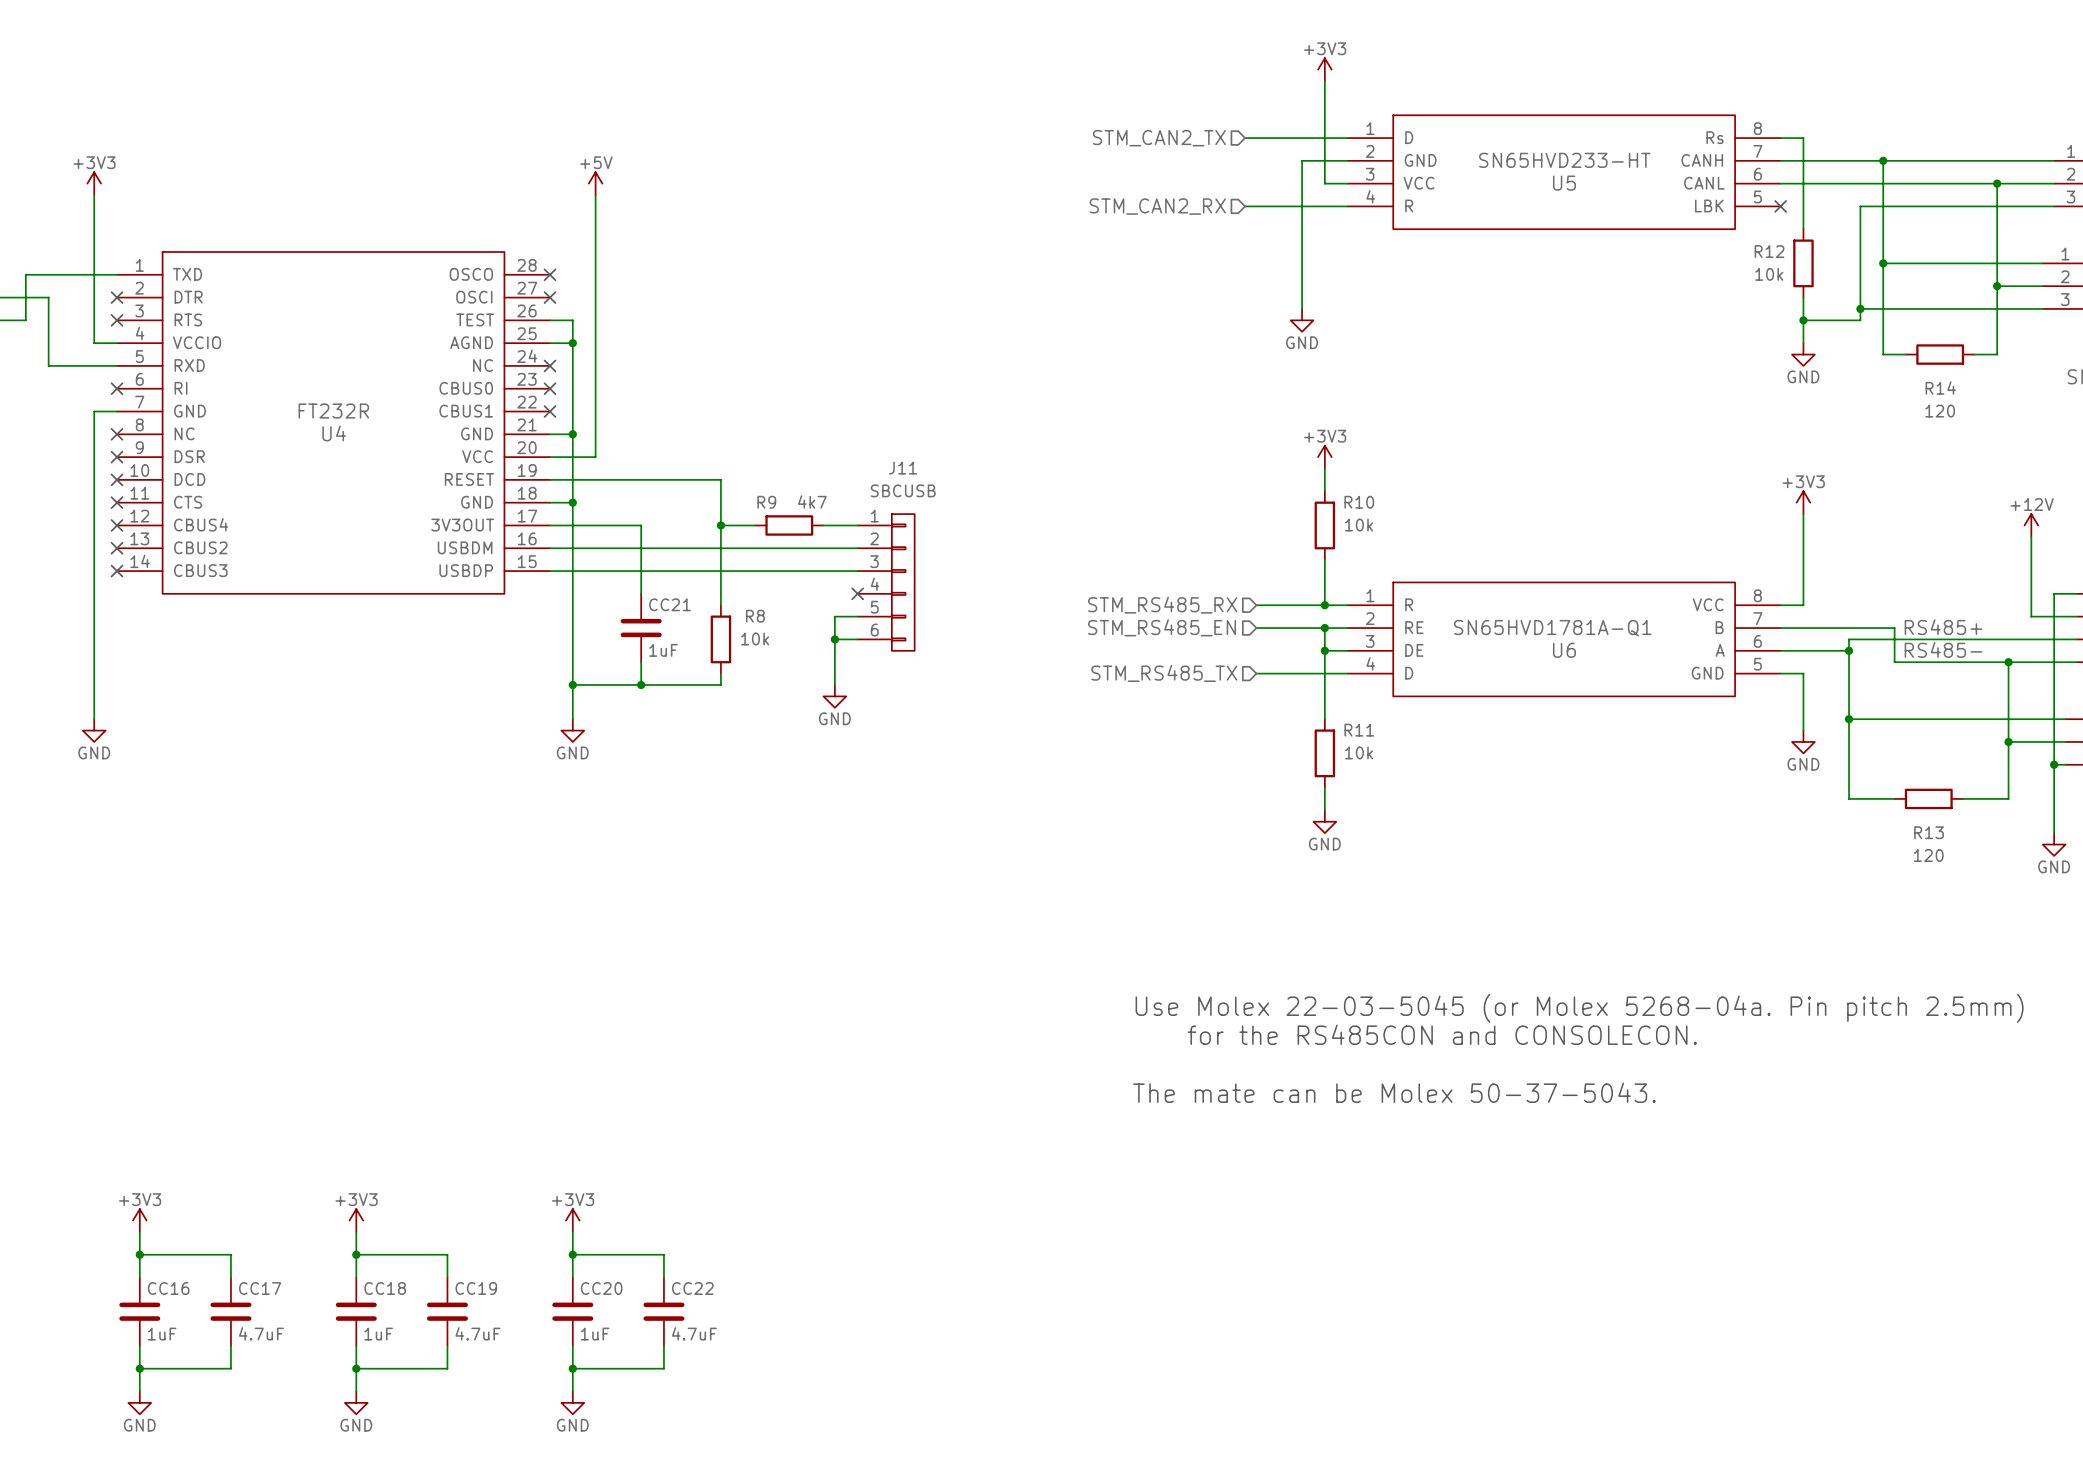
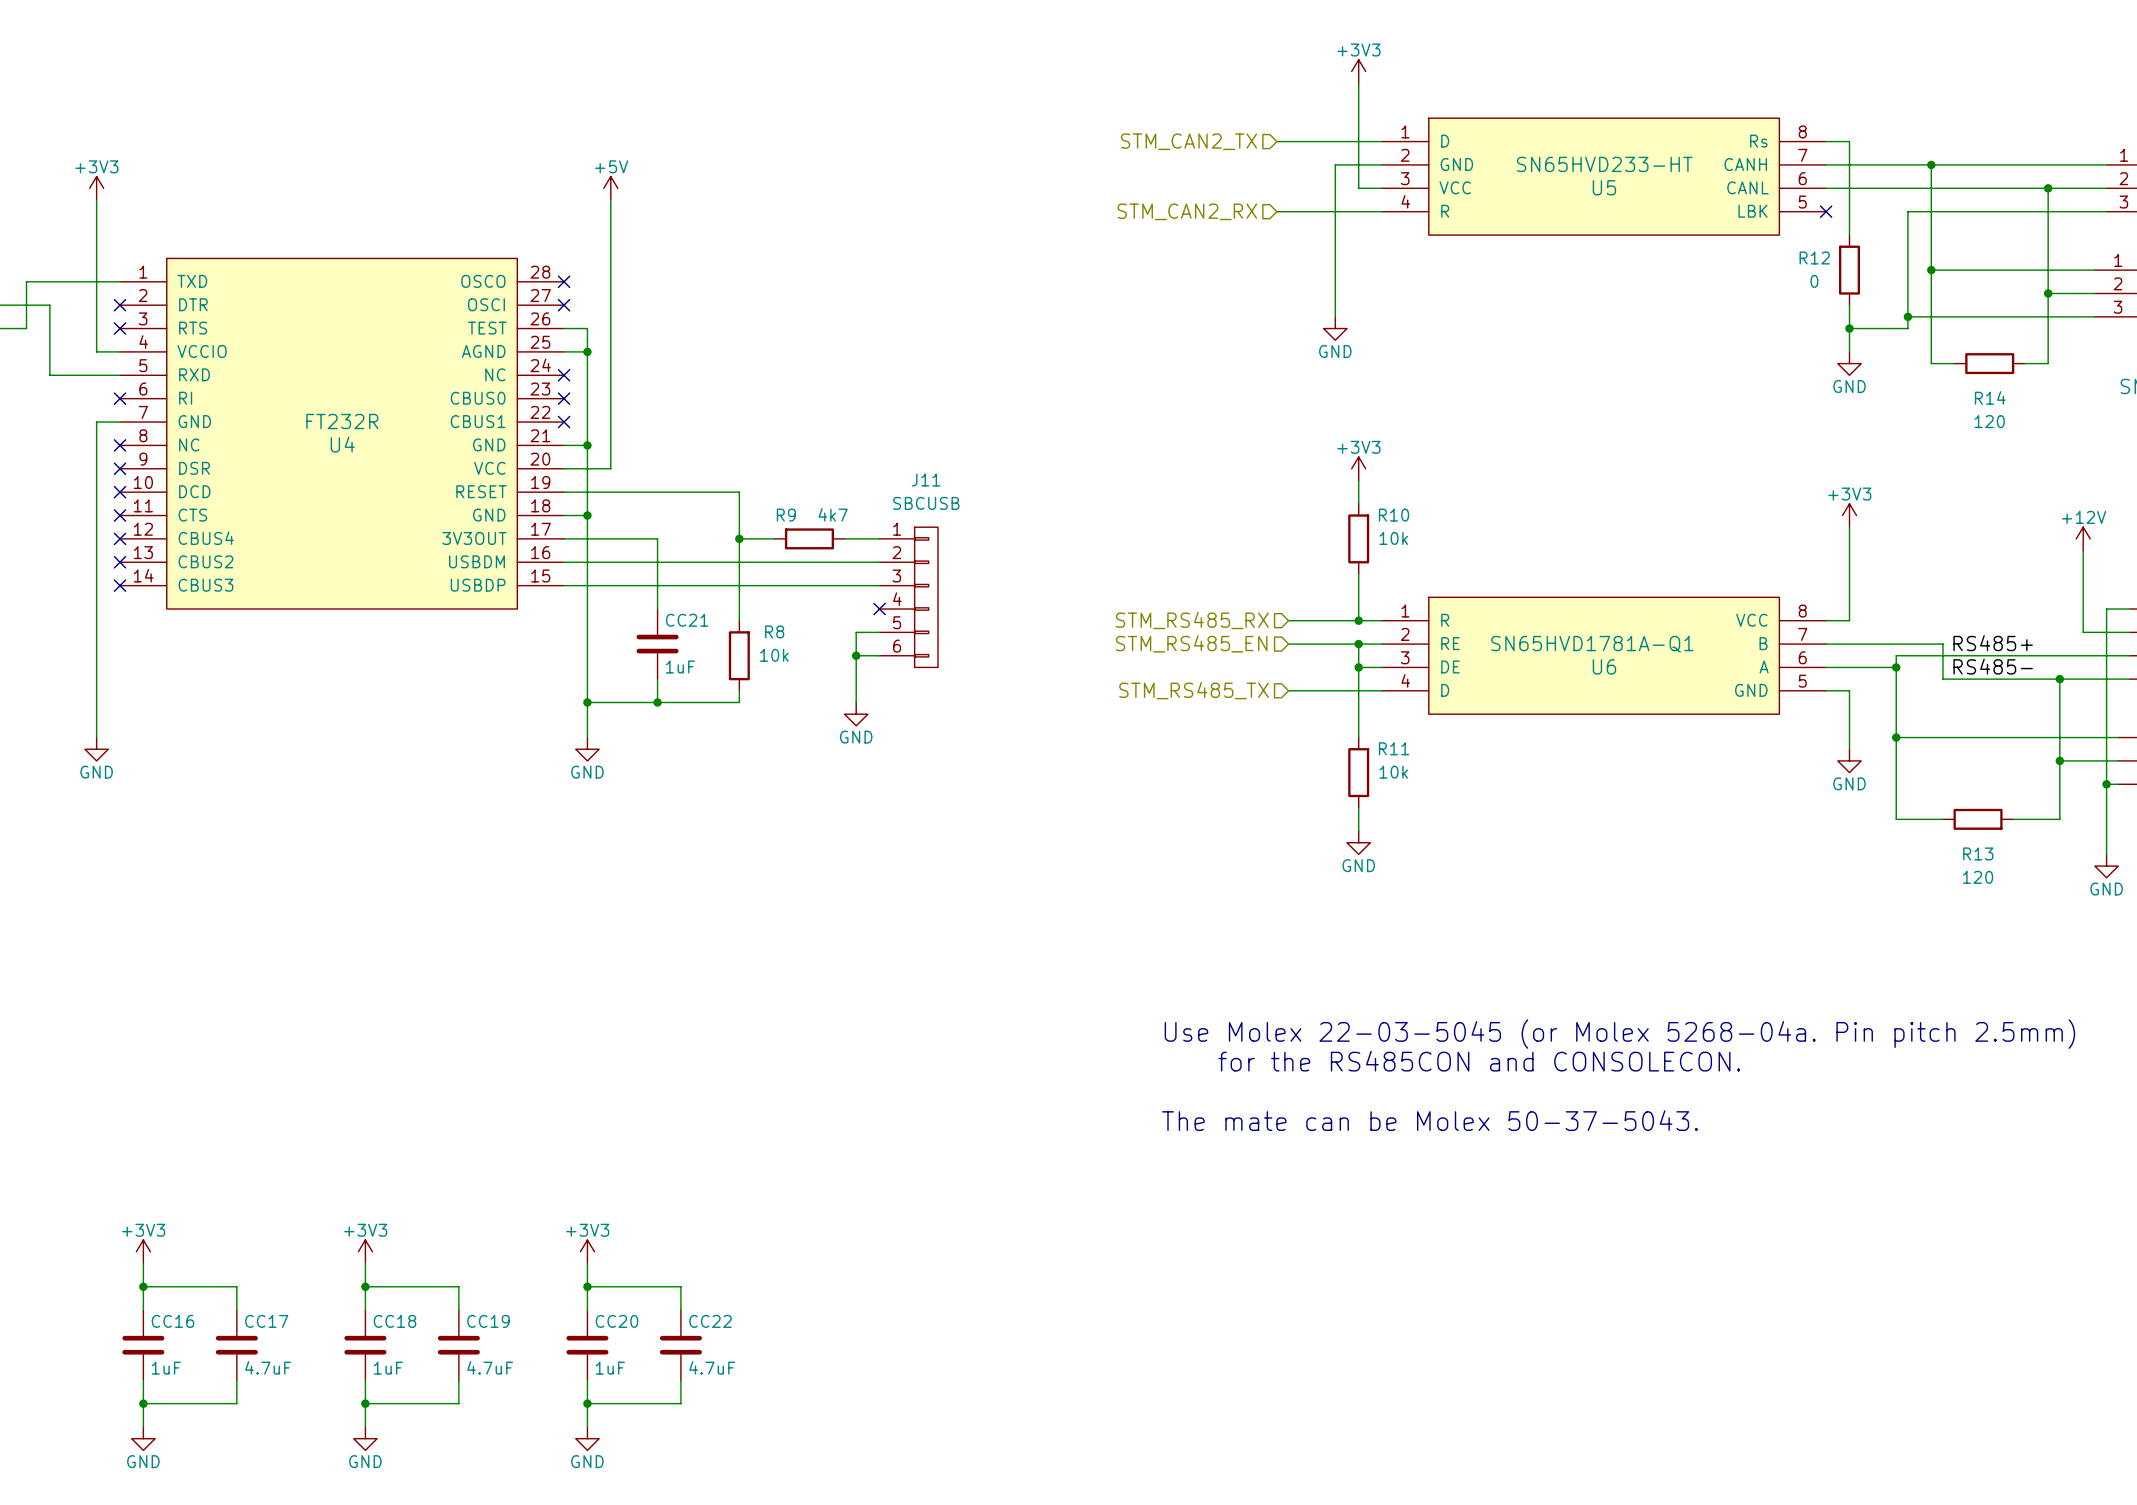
R12 value: 10k (1769, 274) -> 0 (1814, 281)

